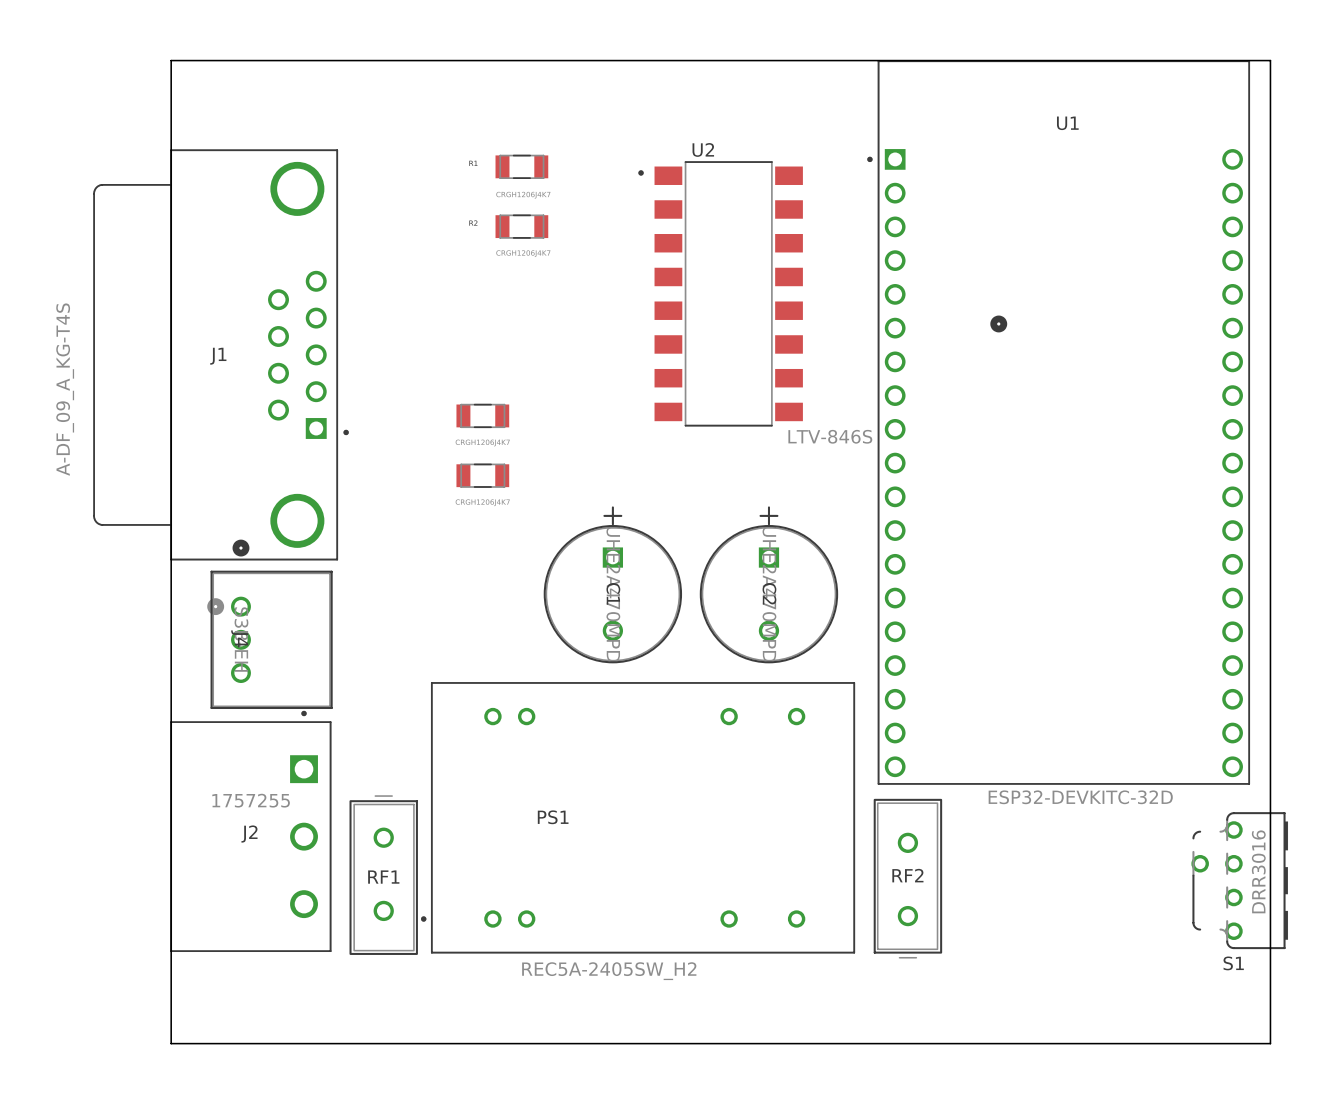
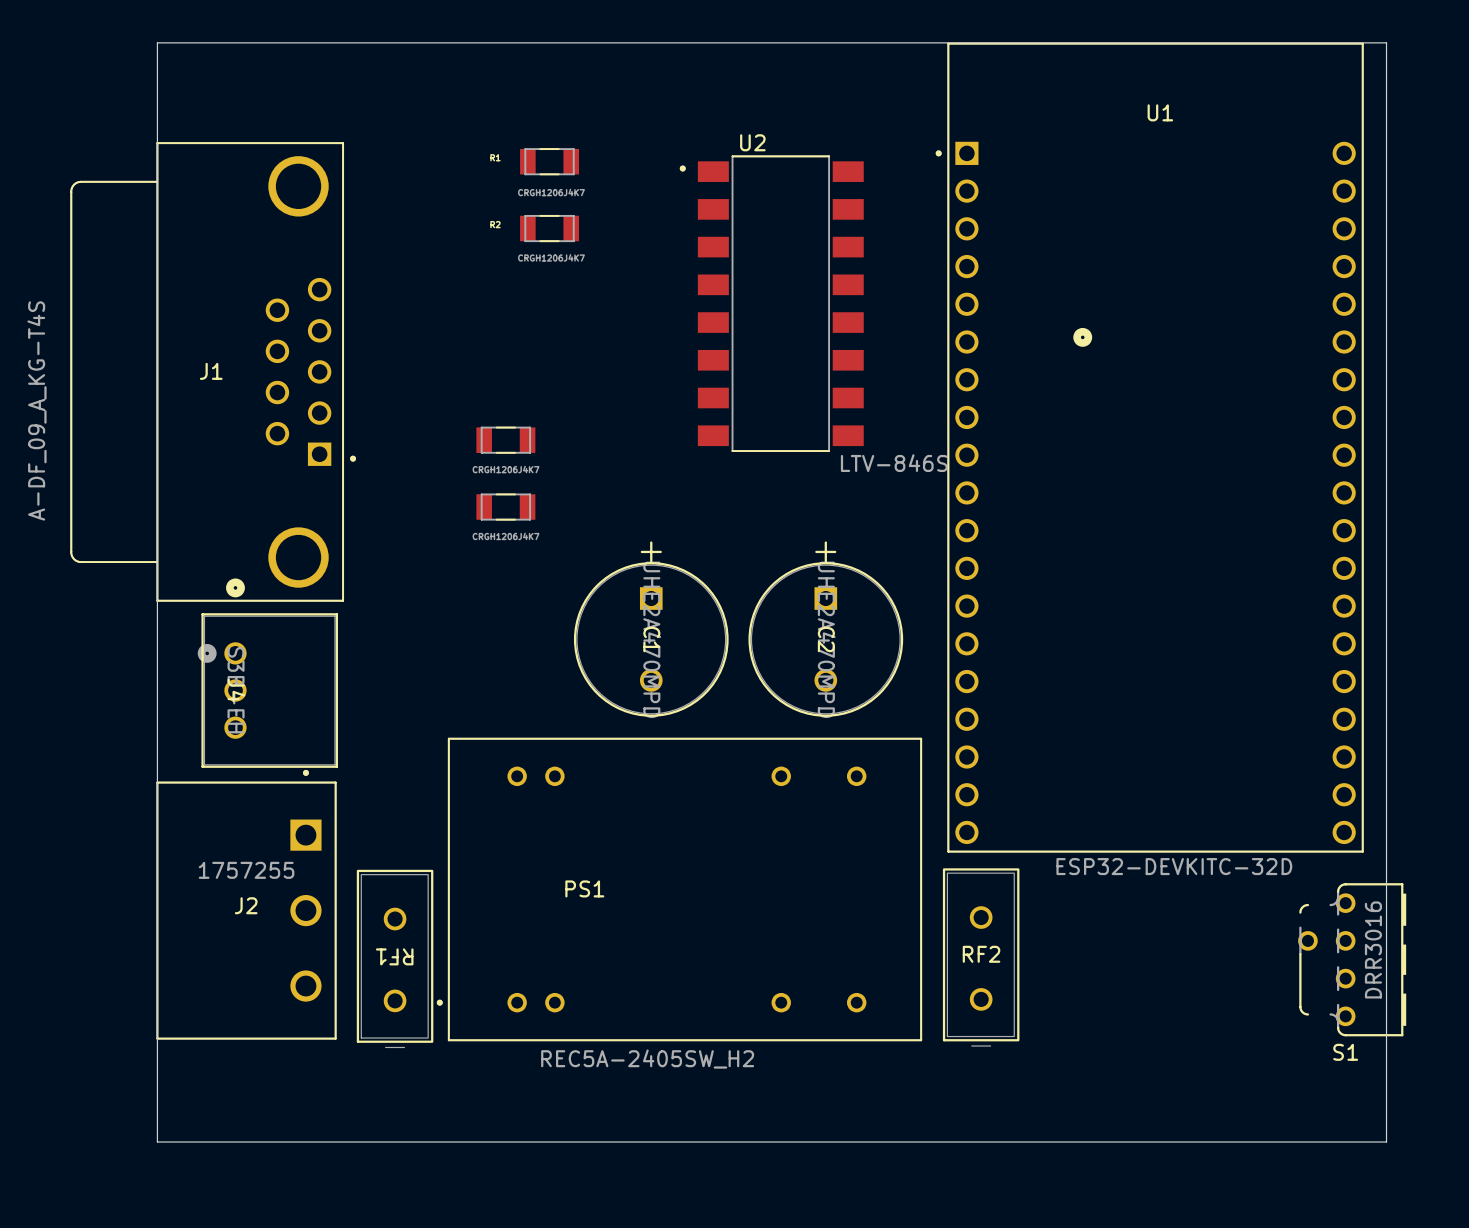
RF1 rotation: 0° (383, 875) -> 180° (395, 958)

